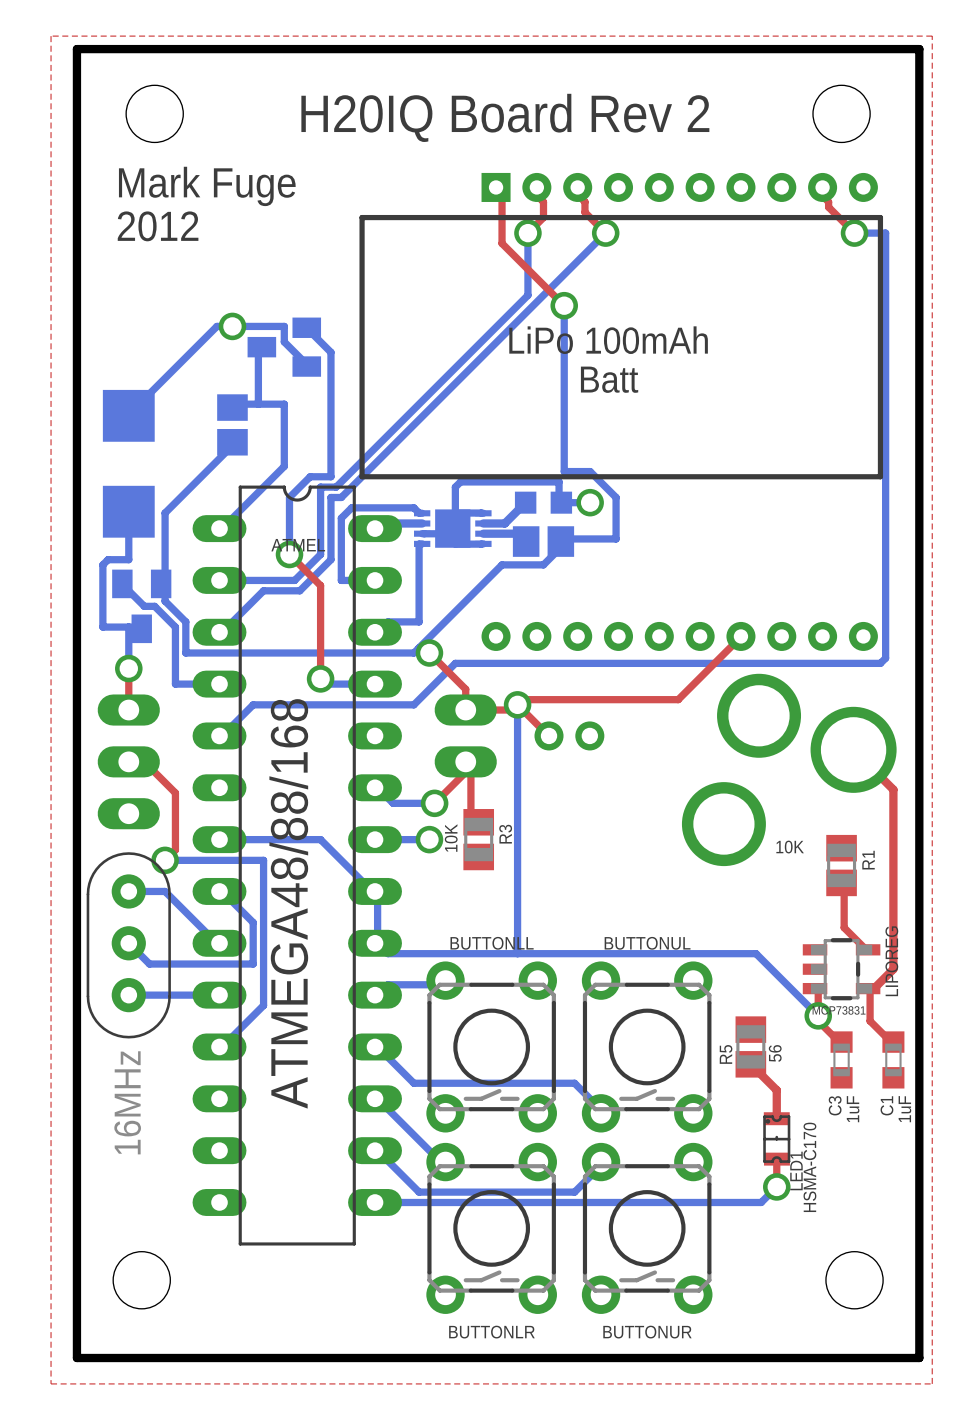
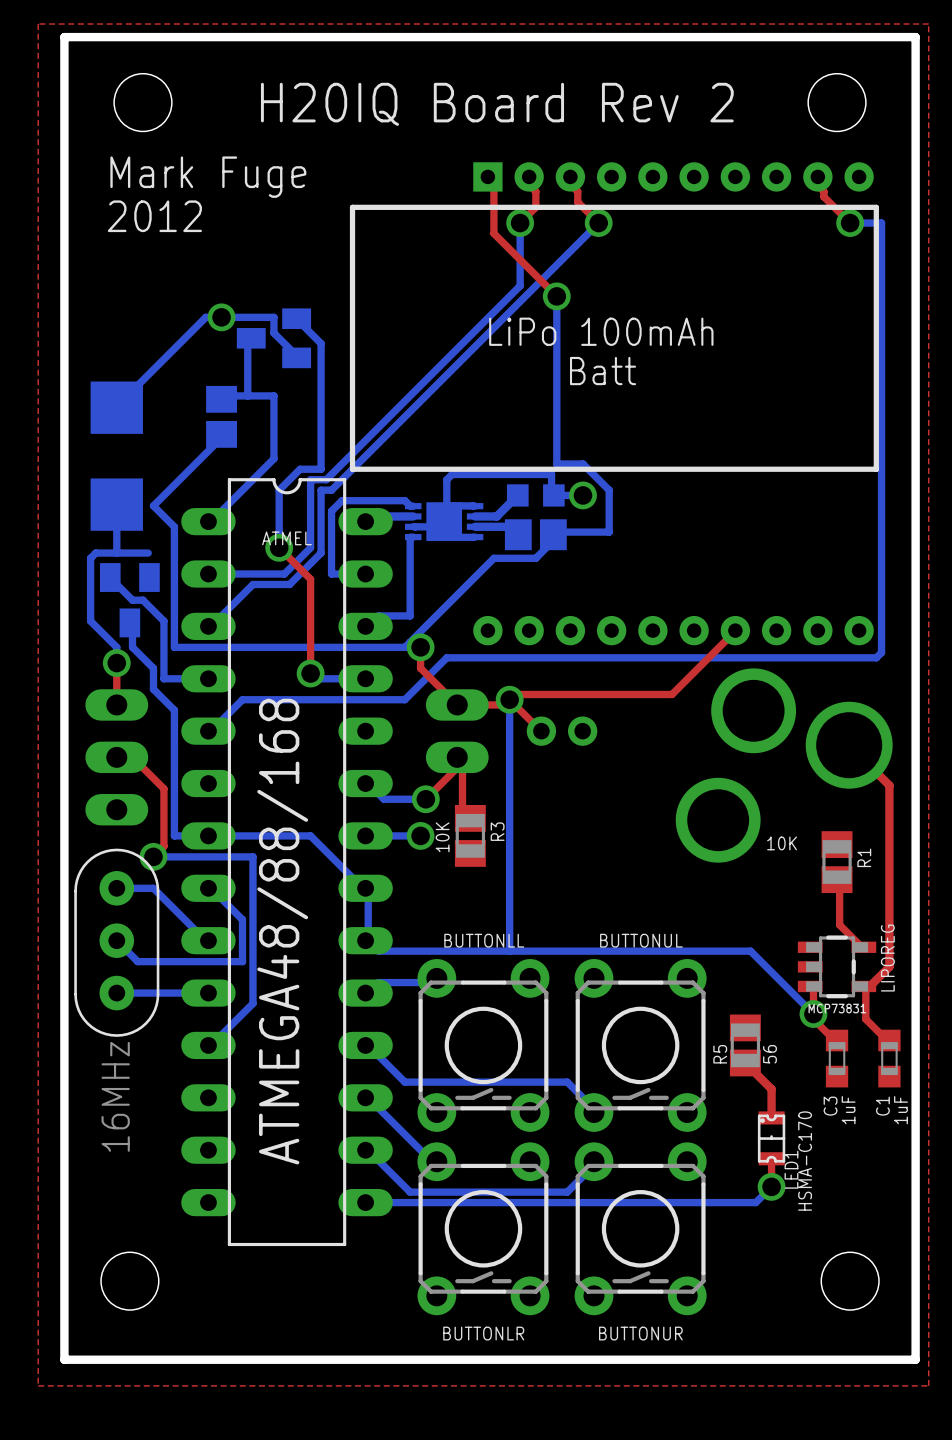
bottom track: (165, 513) (165, 580) (161, 583) (165, 585) (165, 601) (185, 621) -> (153, 505) (174, 526) (174, 615)
bottom track: none -> (116, 553) (148, 553)
bottom track: (102, 627) (139, 627) (141, 628) (139, 632) -> (90, 621) (116, 647)
bottom track: (128, 627) (128, 653) -> none
bottom track: none -> (129, 622) (132, 626) (132, 647) (153, 668) (153, 689) (174, 710) (174, 835) (208, 835)
top track: (429, 653) (465, 689) (465, 710) -> (420, 652) (420, 668) (457, 704)

